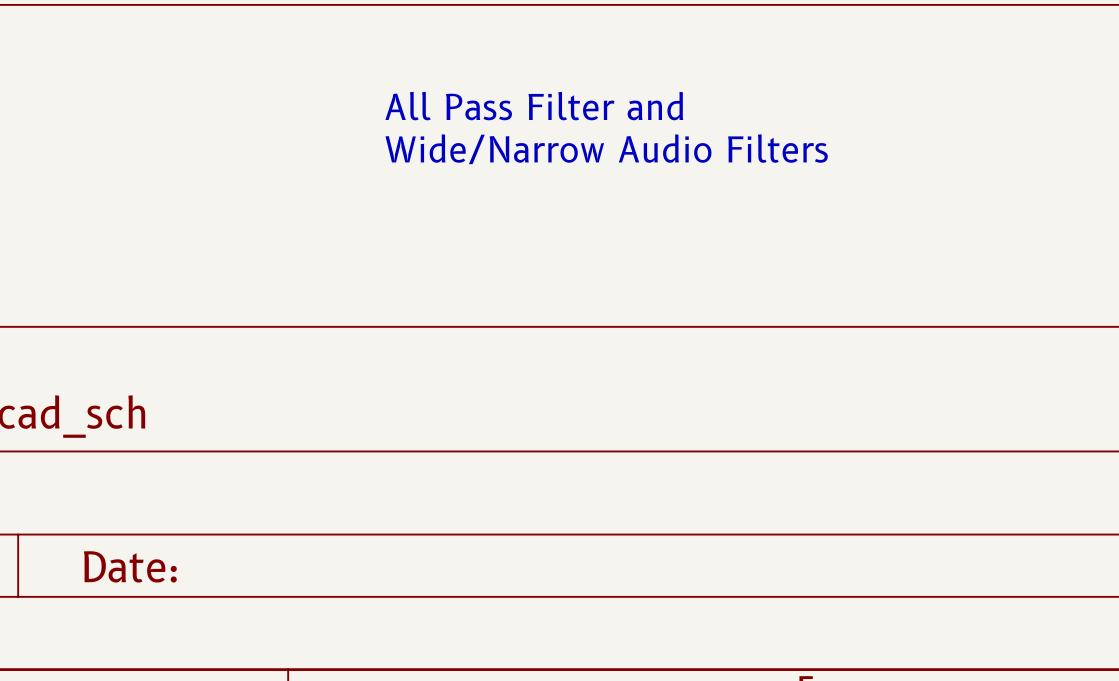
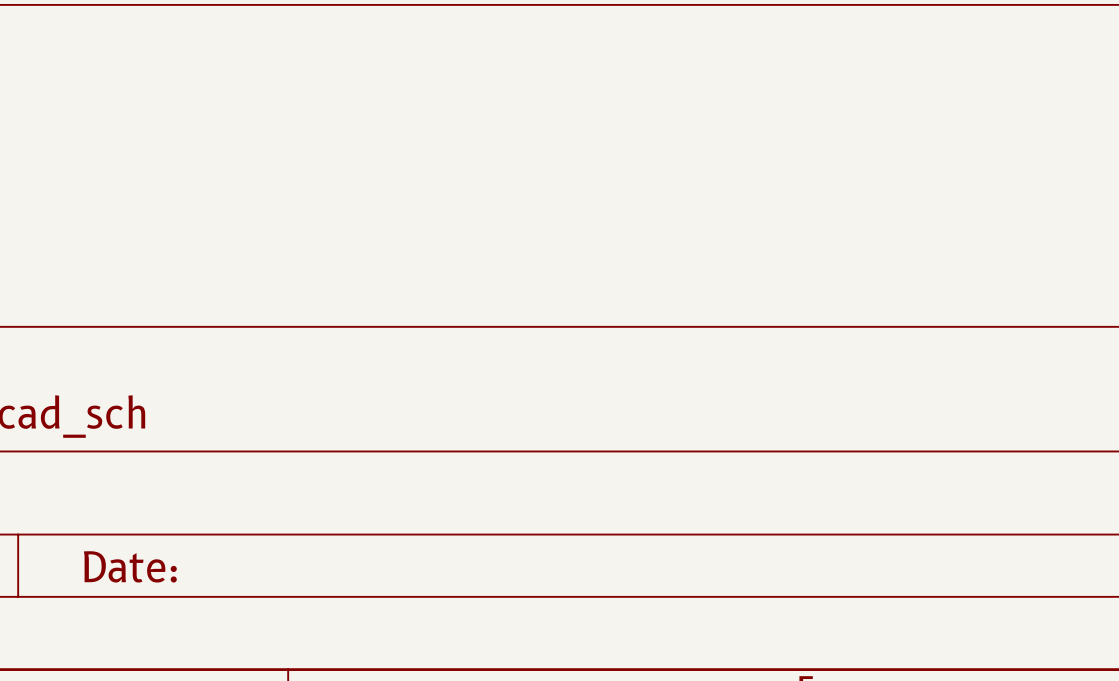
text: All Pass Filter and (534, 106) -> none
text: Wide/Narrow Audio Filters (606, 149) -> none

